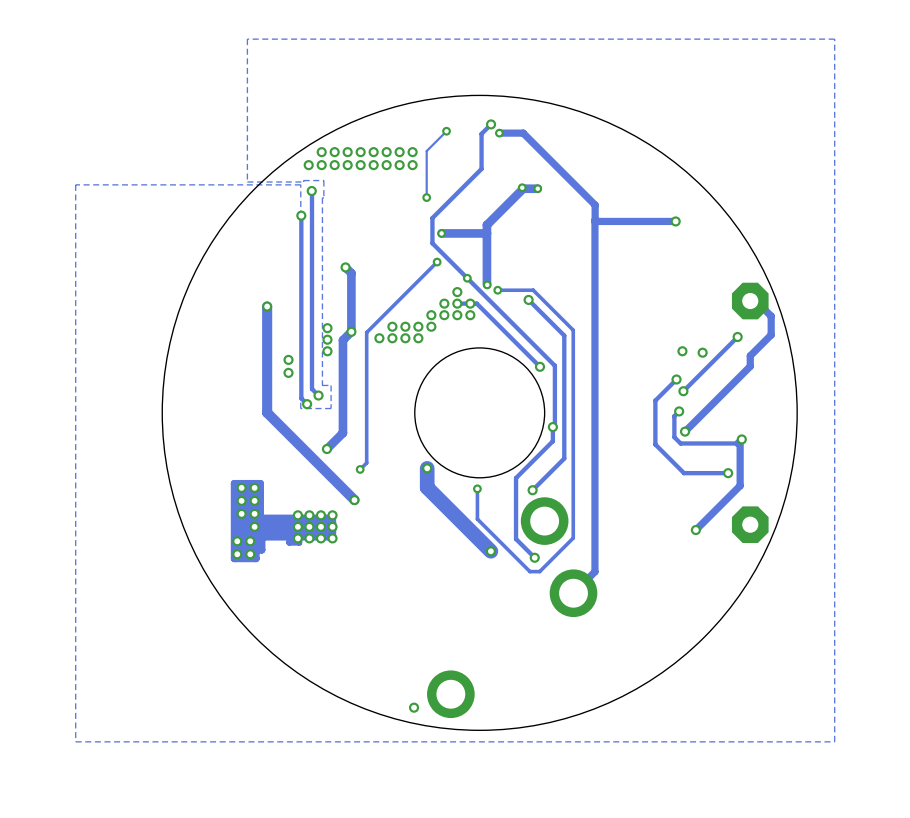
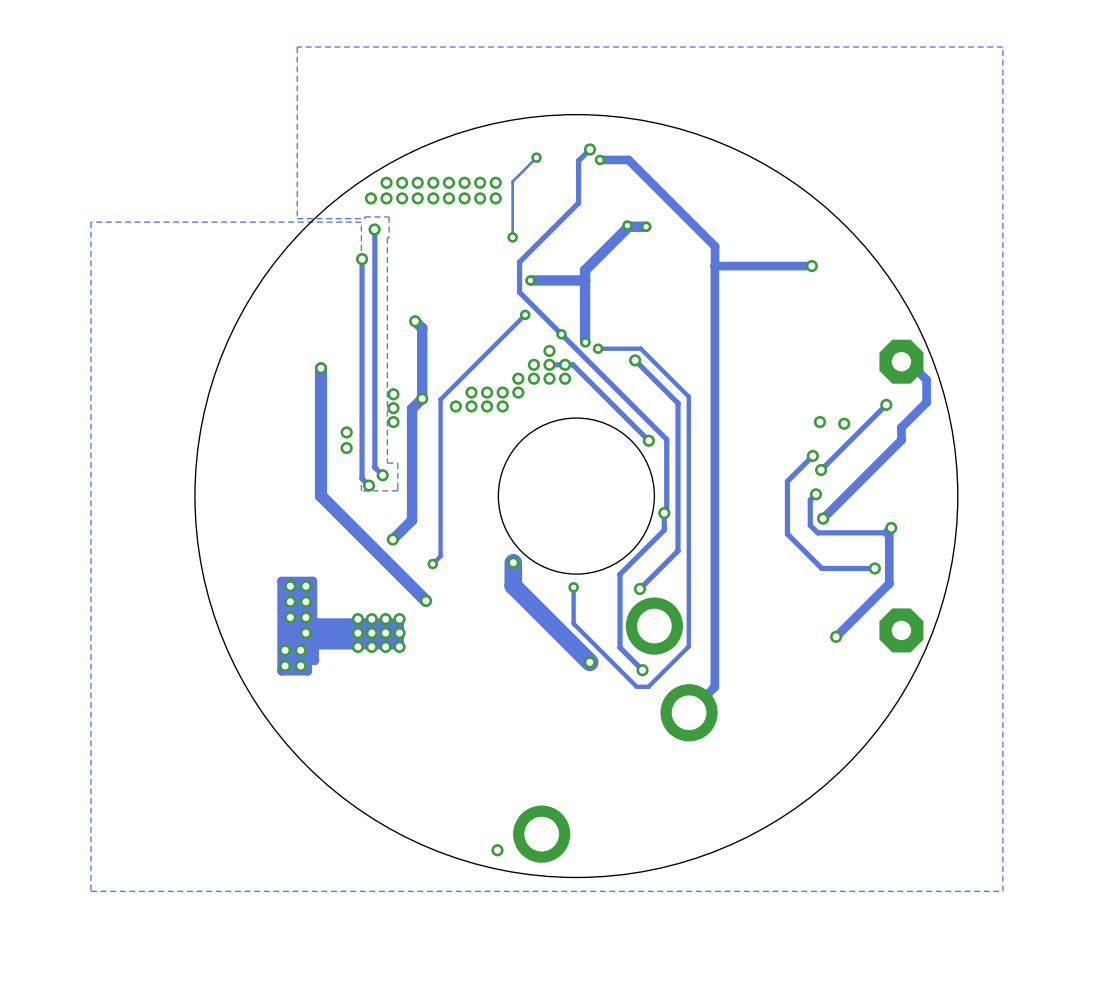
track: (299, 536) (299, 542) (289, 542) (289, 538) (297, 538) -> none

